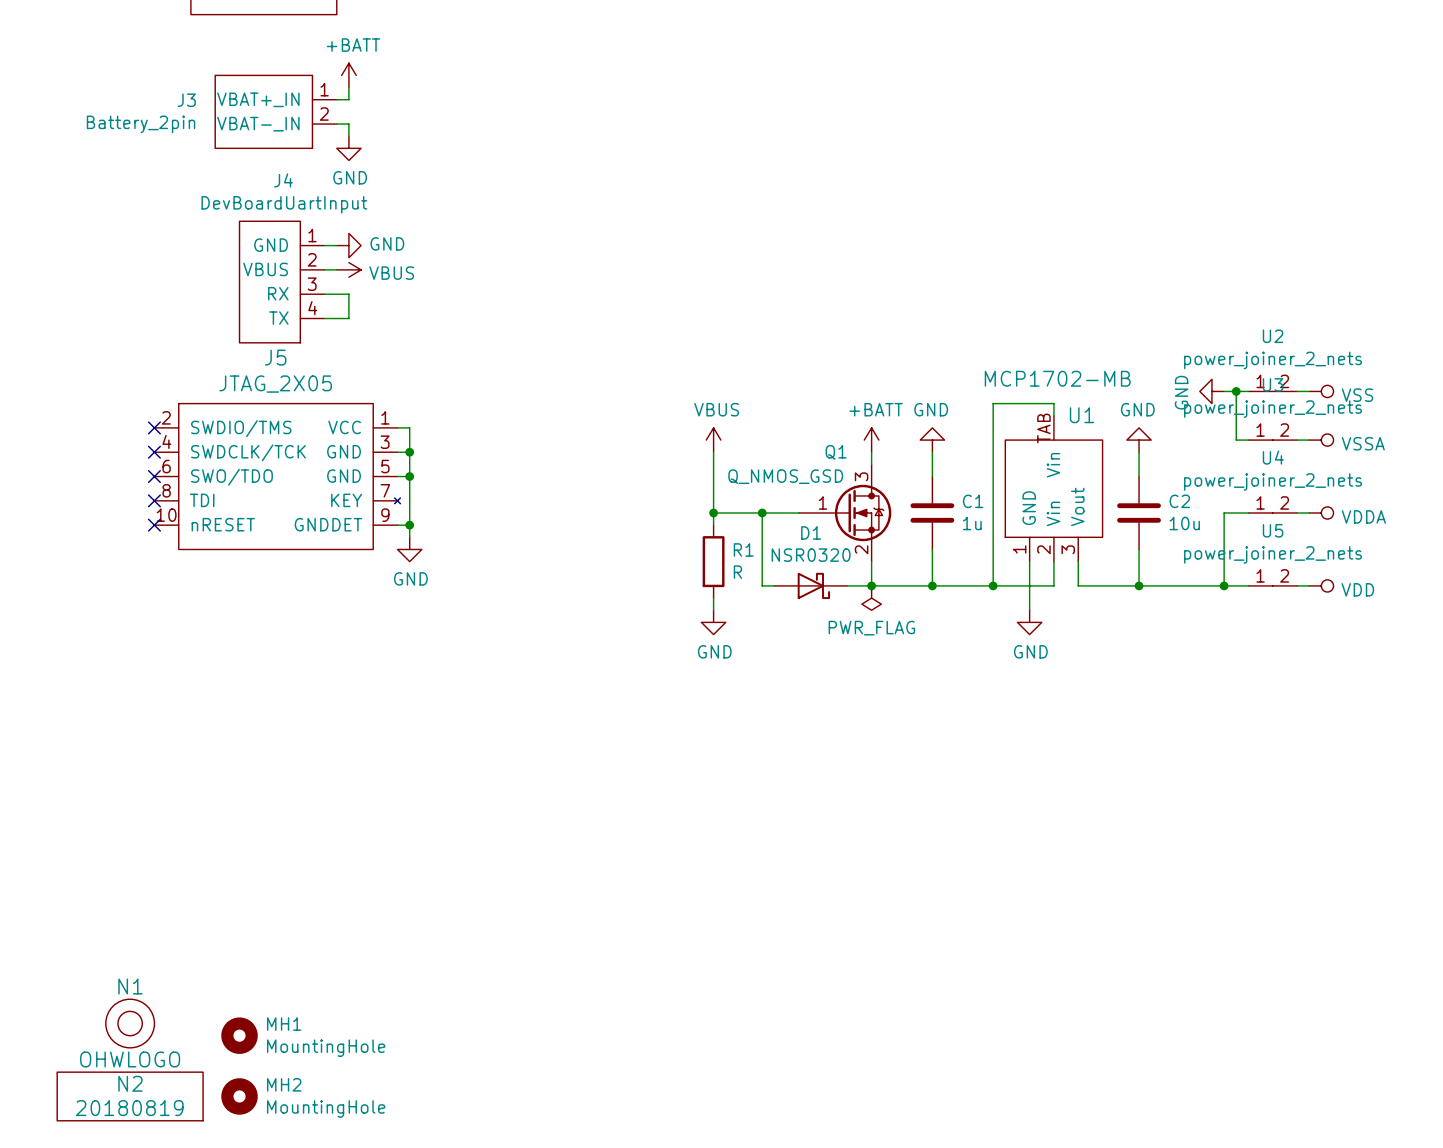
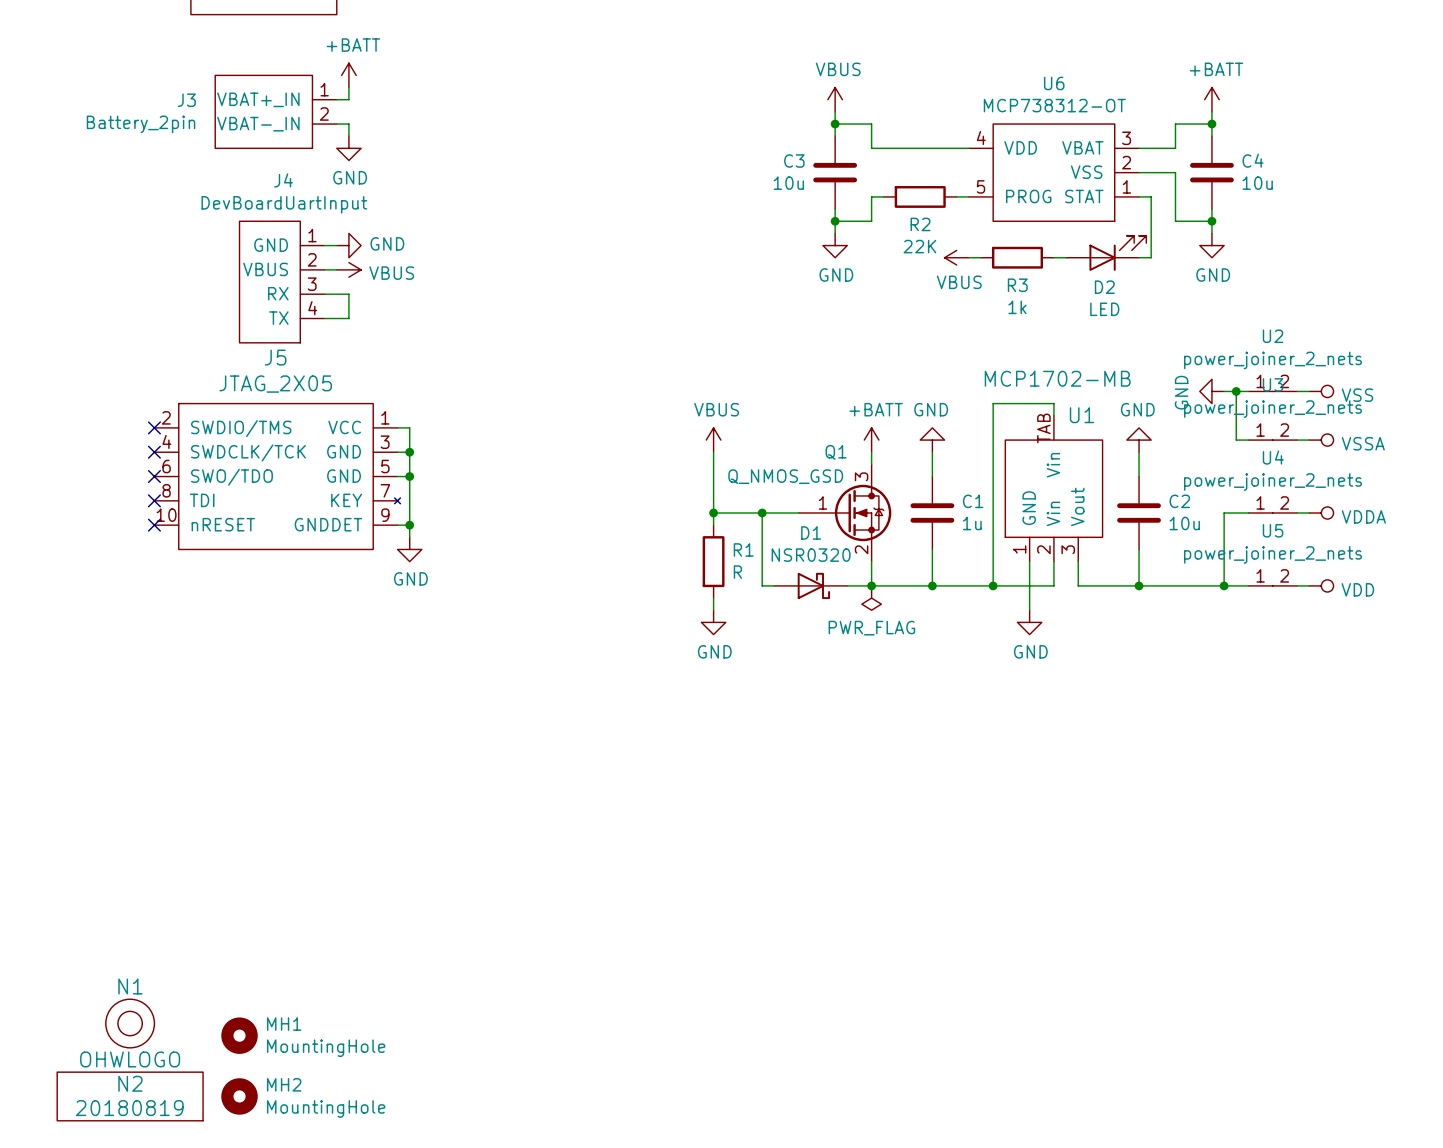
power symbol: none -> VBUS (835, 99)
power symbol: none -> +BATT (1211, 99)
wire: none -> (835, 111) (835, 136)
wire: none -> (1211, 111) (1211, 136)
wire: none -> (835, 124) (871, 124) (871, 148) (968, 148)
junction: none -> (835, 124)
wire: none -> (1211, 124) (1175, 124) (1175, 148) (1139, 148)
junction: none -> (1211, 124)
C3: none -> 10u (835, 172)
U6: none -> MCP738312-OT (1053, 172)
wire: none -> (1139, 172) (1175, 172) (1175, 221) (1211, 221)
C4: none -> 10u (1211, 172)
wire: none -> (883, 196) (871, 196) (871, 221) (835, 221)
R2: none -> 22K (920, 196)
wire: none -> (956, 196) (968, 196)
wire: none -> (1139, 196) (1151, 196) (1151, 257) (1139, 257)
wire: none -> (835, 209) (835, 233)
wire: none -> (1211, 209) (1211, 233)
junction: none -> (835, 221)
junction: none -> (1211, 221)
power symbol: none -> GND (835, 245)
power symbol: none -> GND (1211, 245)
D2: none -> LED (1106, 253)
power symbol: none -> VBUS (956, 257)
wire: none -> (968, 257) (981, 257)
R3: none -> 1k (1017, 257)
wire: none -> (1053, 257) (1066, 257)

